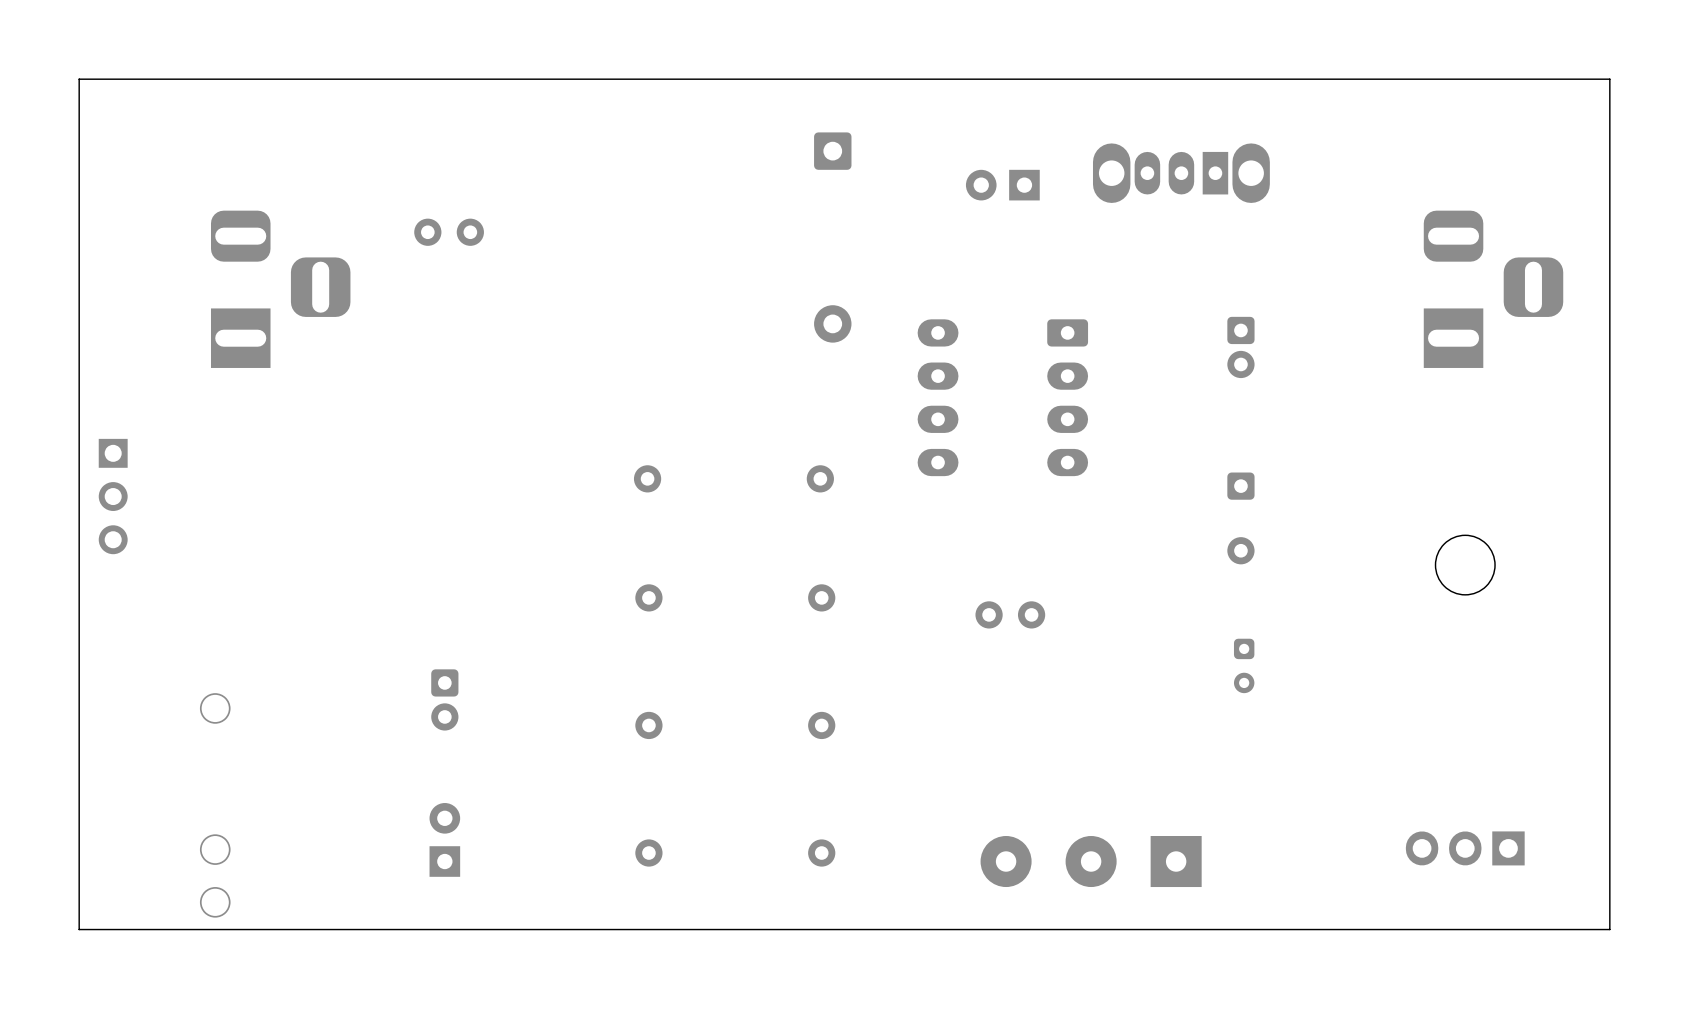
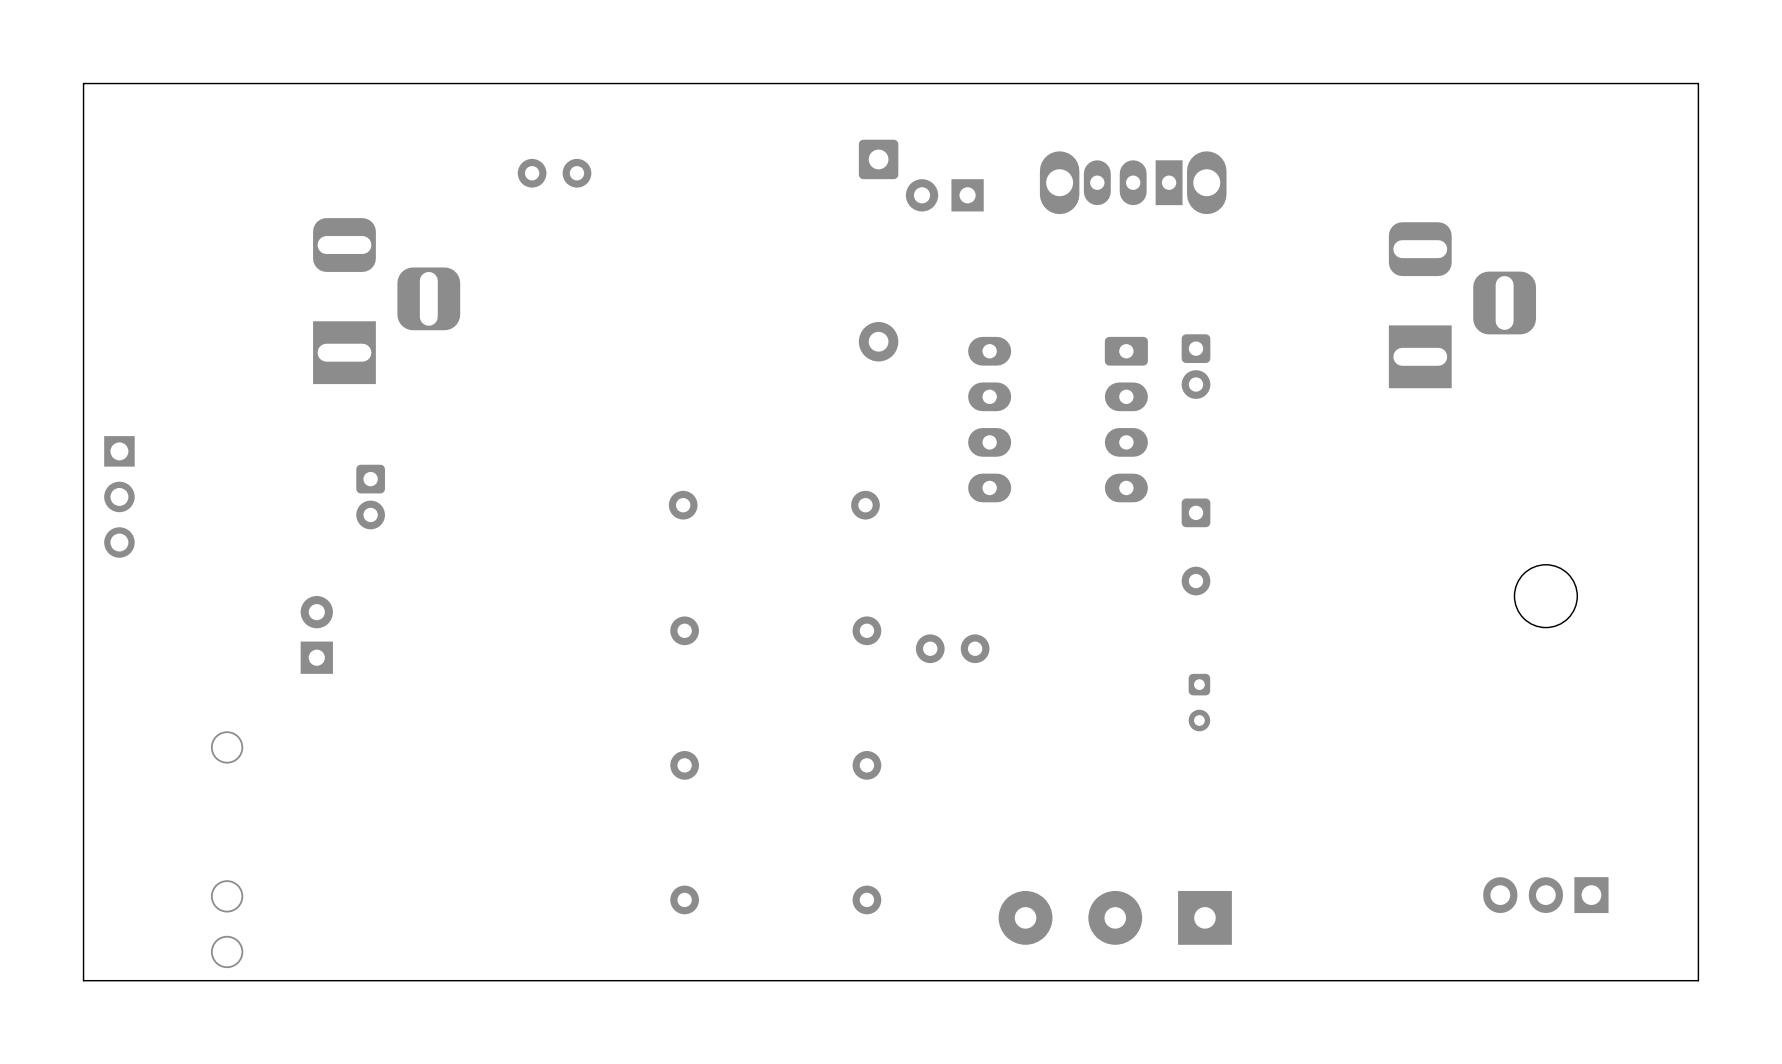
part position: (1181, 173) -> (1133, 182)
part position: (1002, 185) -> (944, 195)
part position: (449, 232) -> (554, 173)
part position: (280, 289) -> (386, 301)
part position: (1493, 289) -> (1462, 305)
part position: (1240, 347) -> (1196, 366)
part position: (113, 496) -> (119, 496)
part position: (1240, 518) -> (1196, 546)
part position: (1010, 614) -> (952, 648)
part position: (1244, 665) -> (1199, 702)
part position: (444, 699) -> (370, 497)
part position: (444, 839) -> (316, 634)
part position: (1091, 861) -> (1115, 917)

